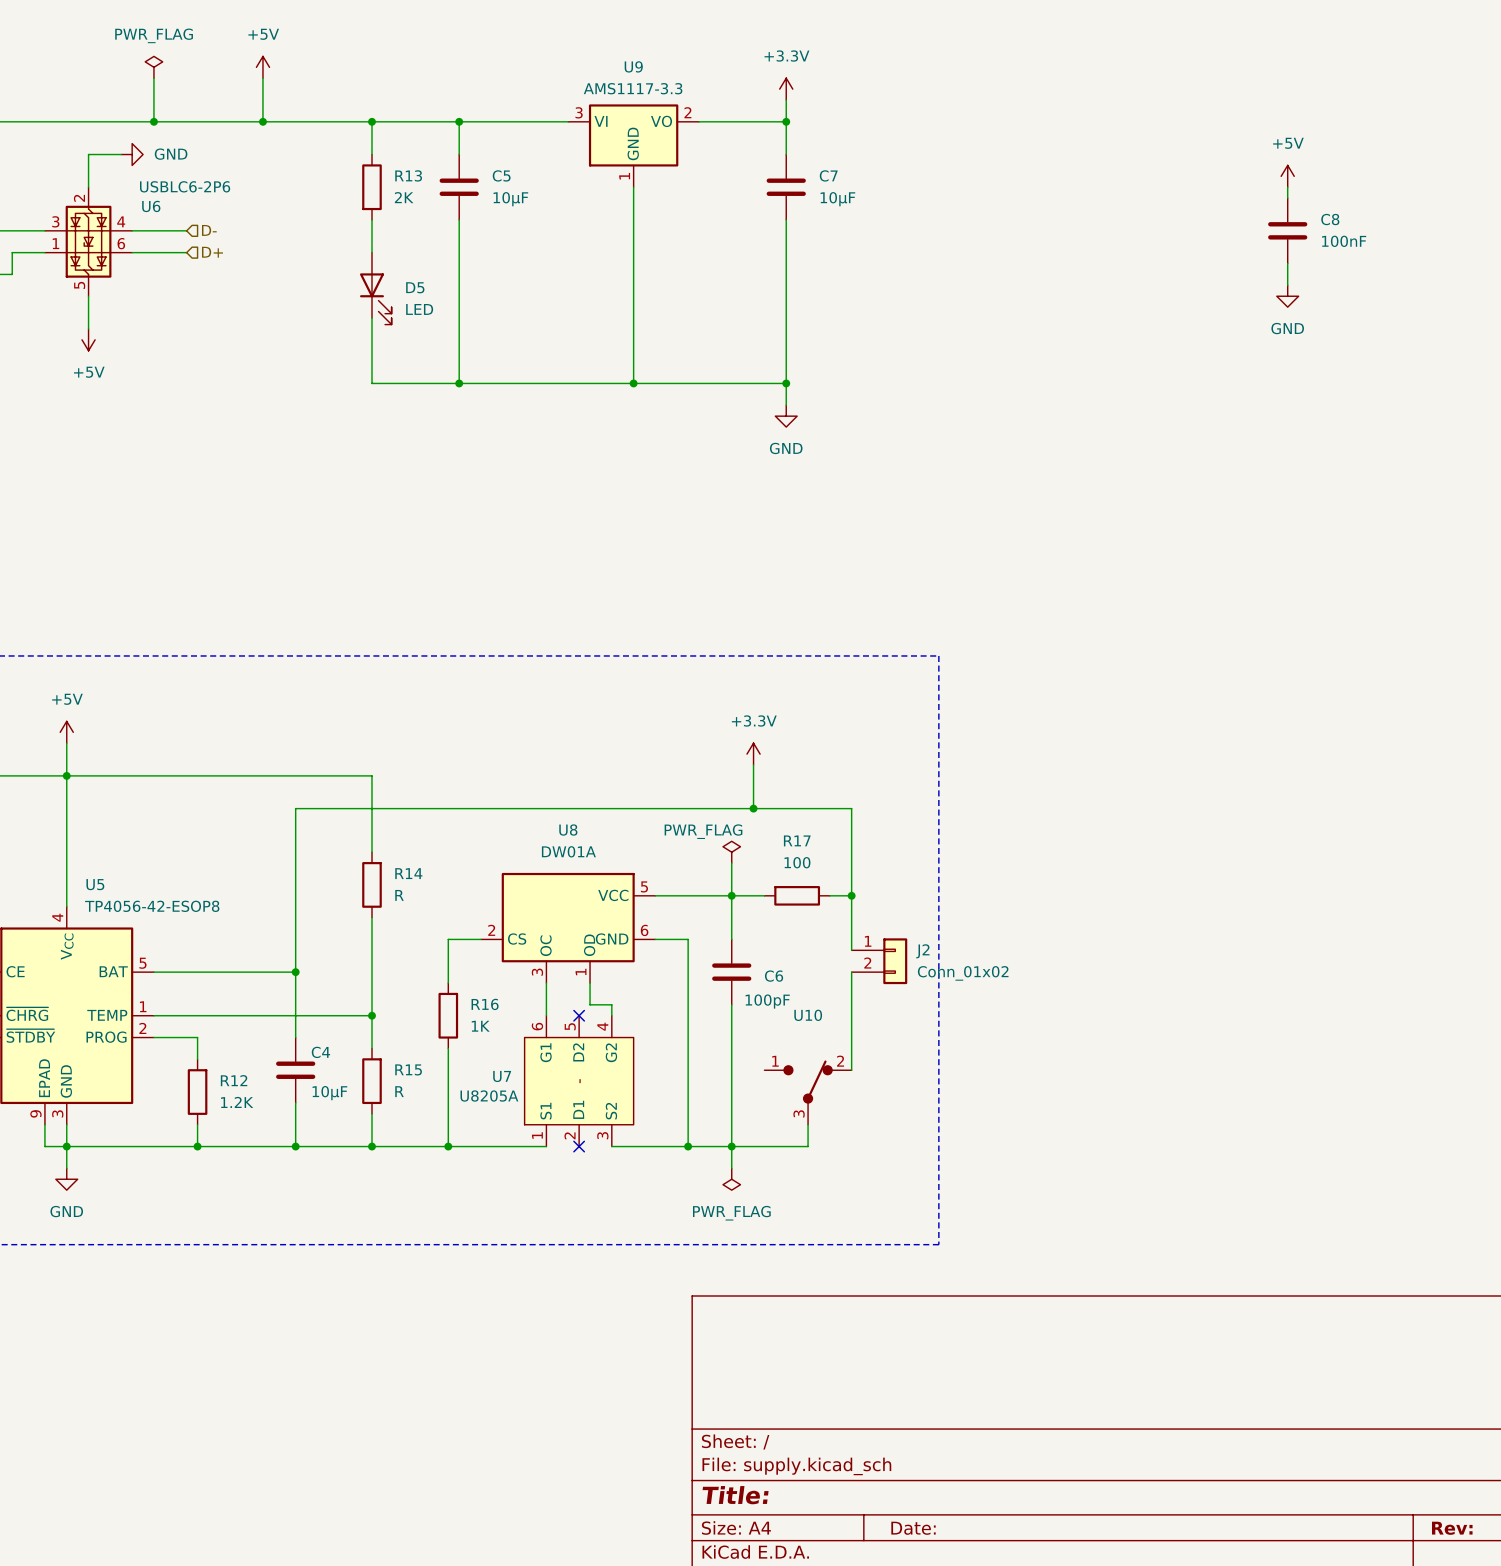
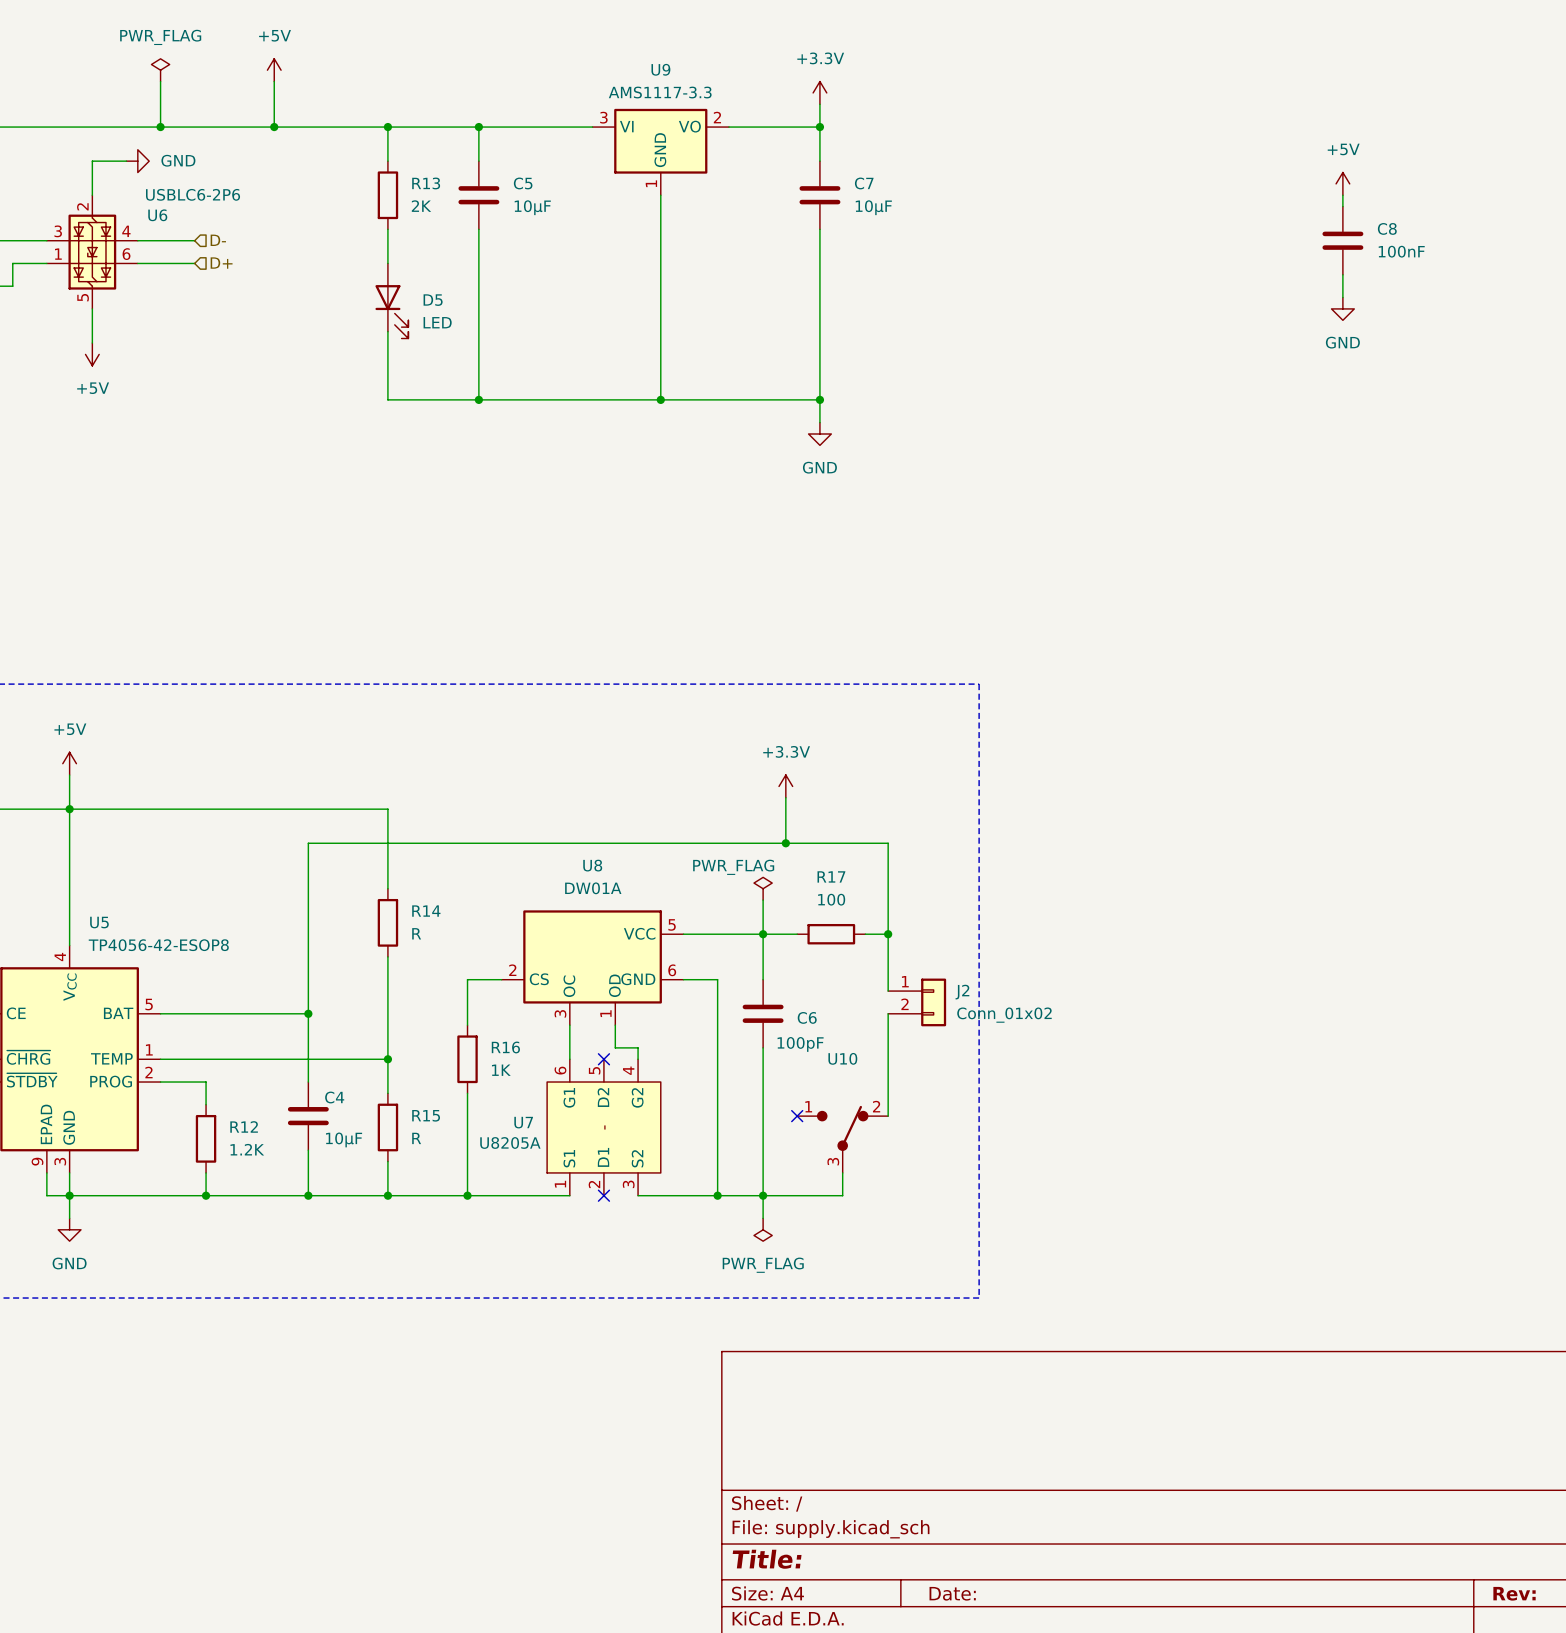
no-connect mark: none -> (797, 1116)

